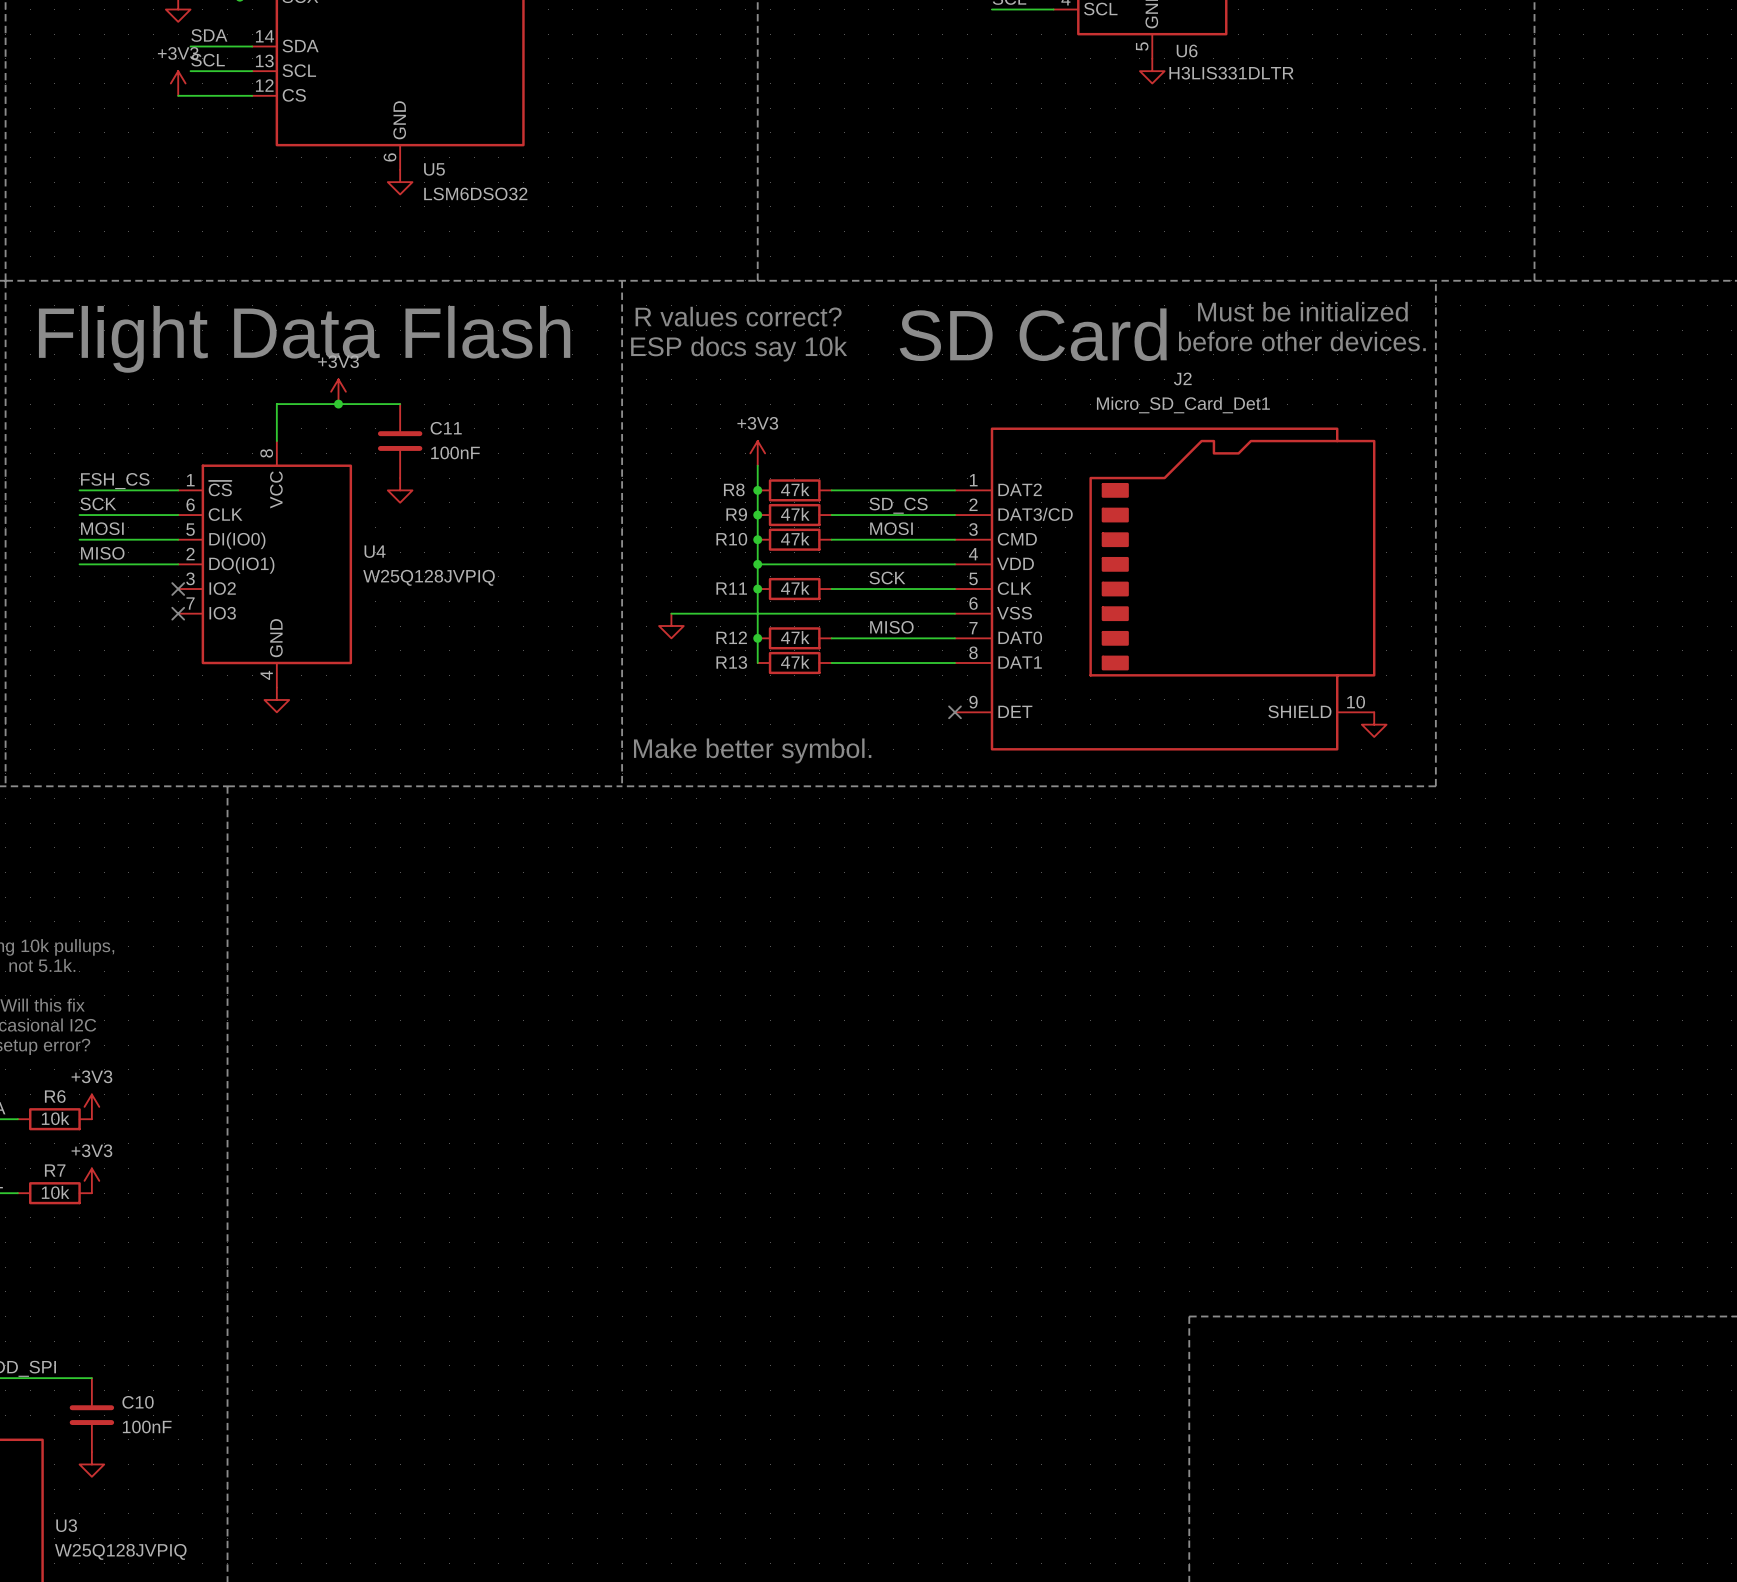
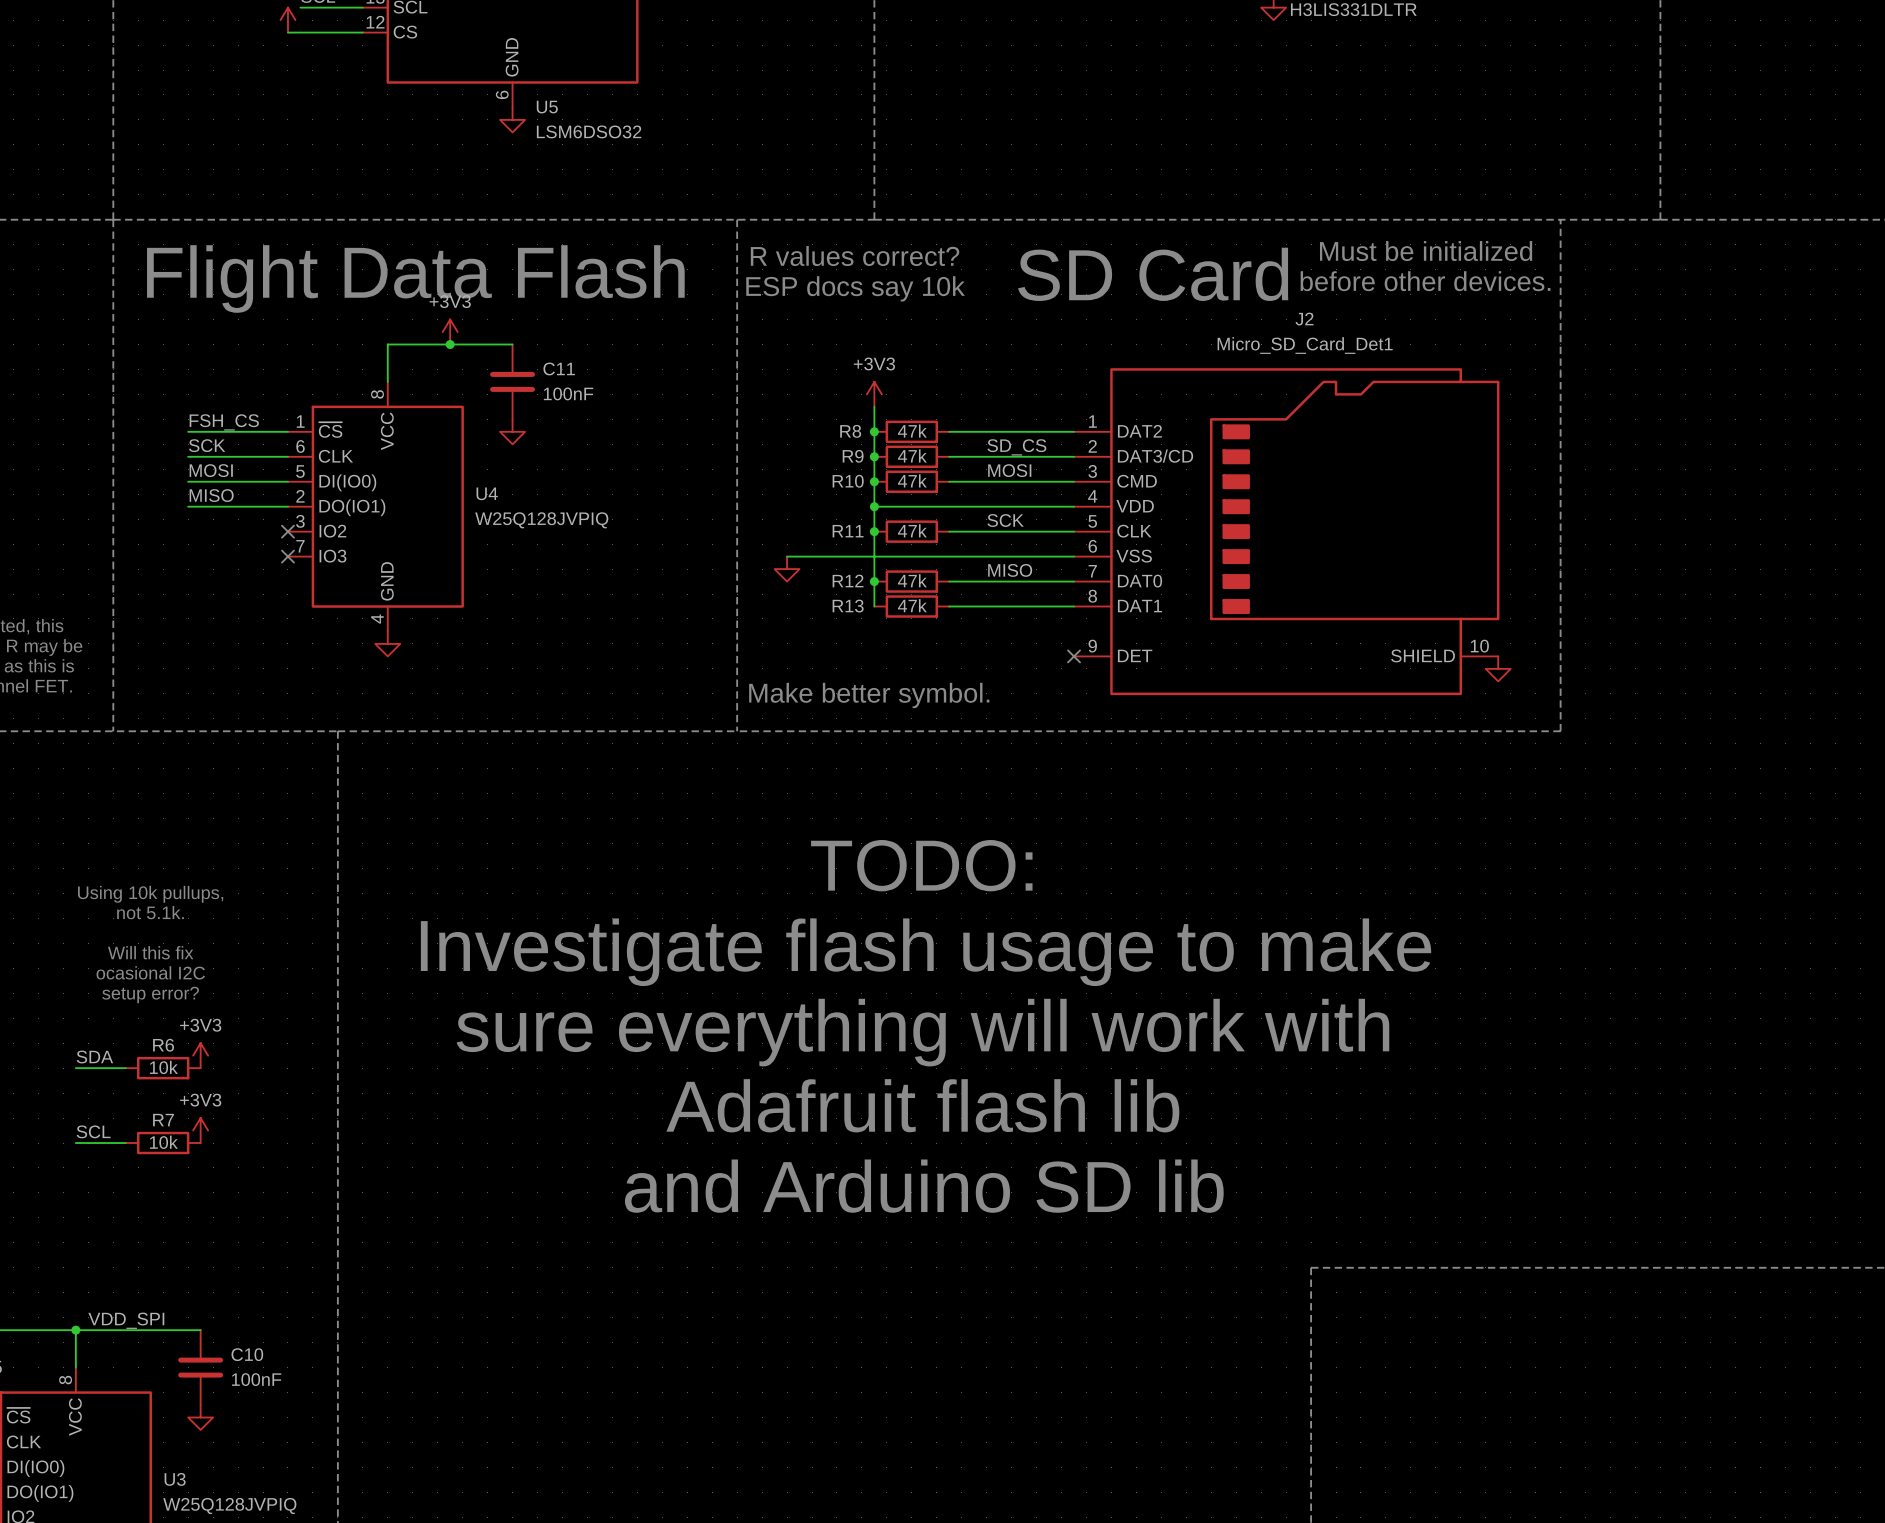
text: none -> TODO: (921, 865)
text: none -> Investigate flash usage to make (926, 952)
text: none -> sure everything will work with (922, 1032)
text: none -> Adafruit flash lib (922, 1105)
text: none -> and Arduino SD lib (924, 1186)

